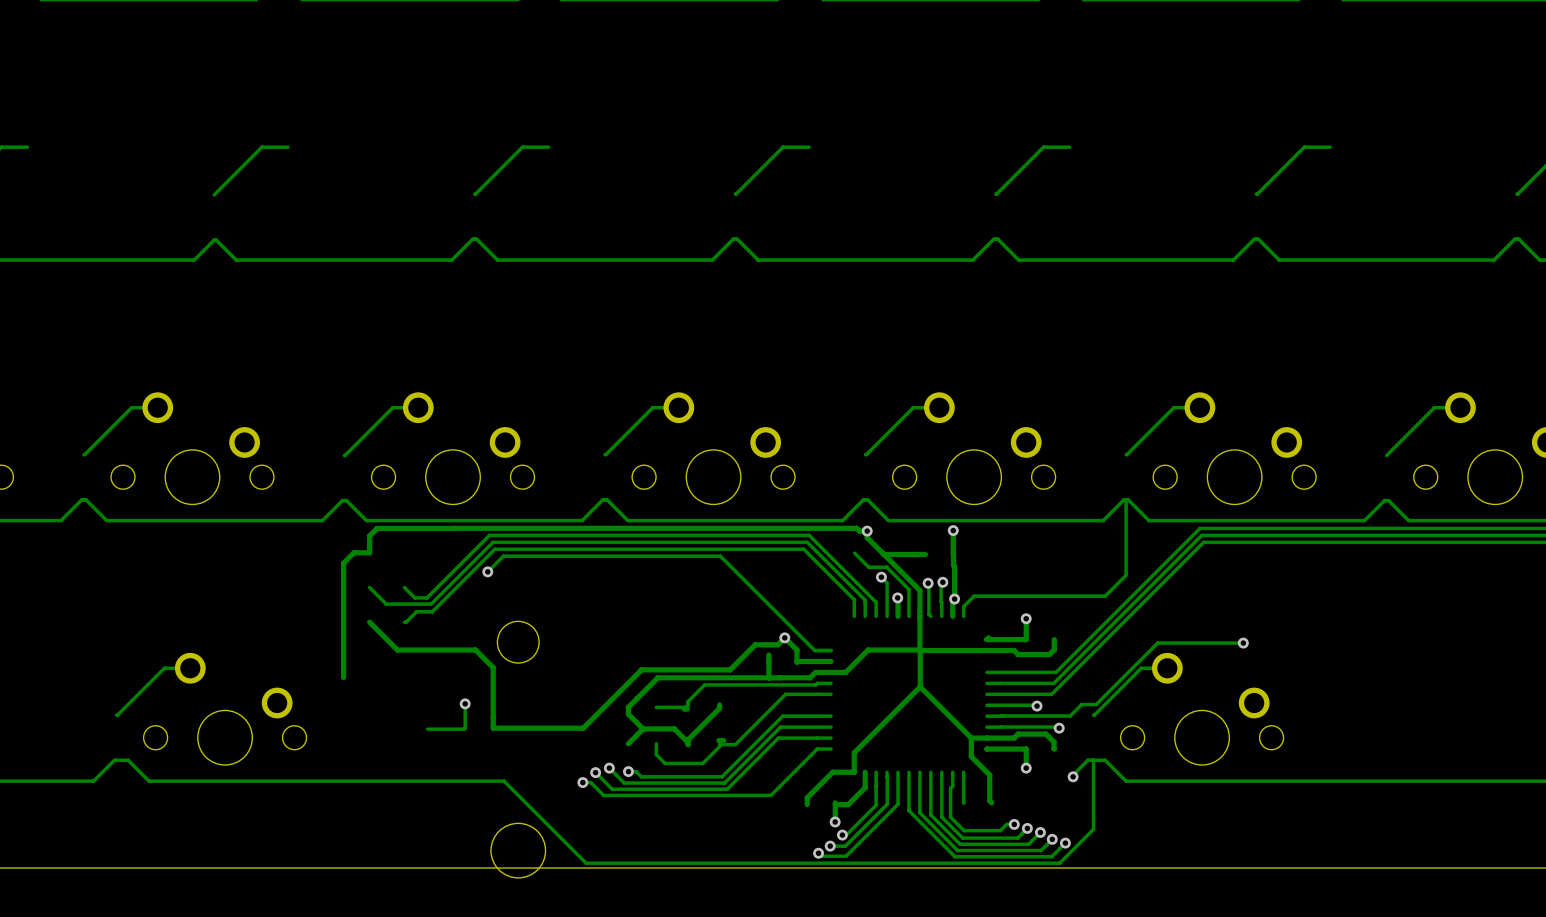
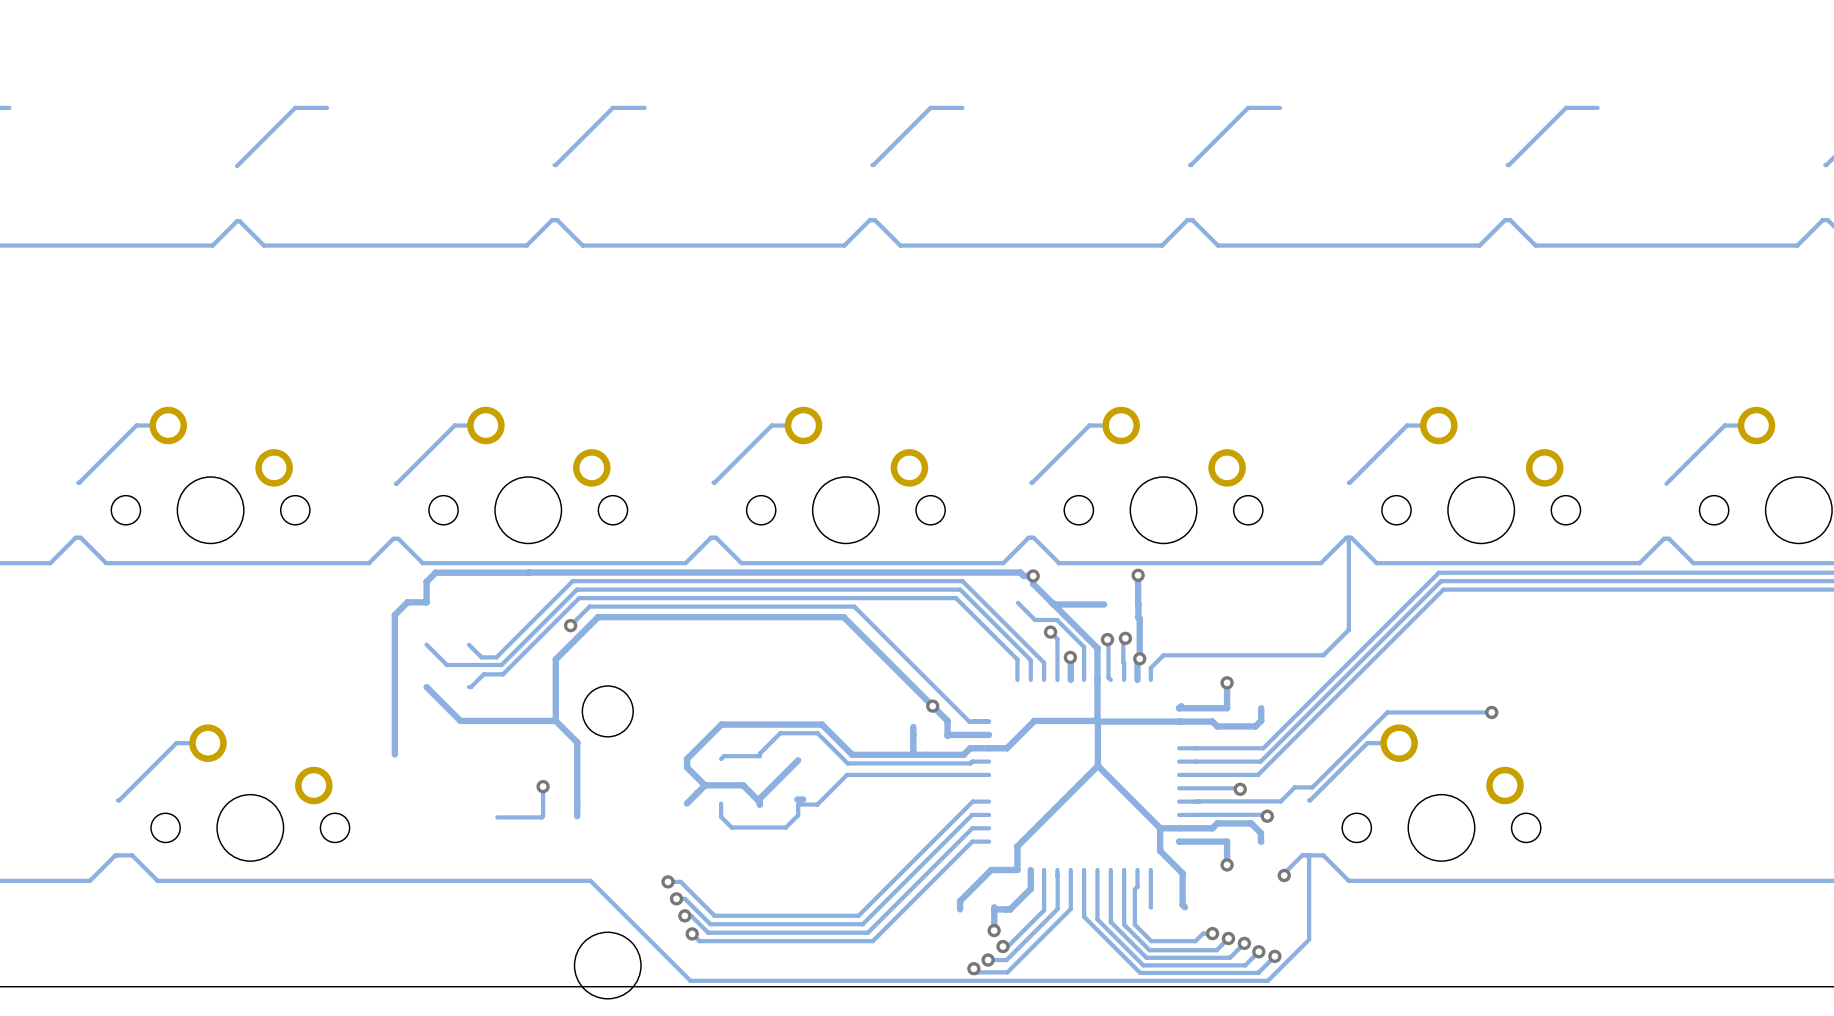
track: (784, 637) (777, 644) (755, 644) (730, 669) (641, 669) (583, 728) (493, 728) -> (932, 706) (843, 617) (598, 617) (555, 659) (555, 720)
track: (718, 677) (657, 677) (628, 707) -> (852, 754) (822, 724) (721, 724) (686, 759)
track: none -> (798, 760) (759, 798) (759, 804)
track: (715, 684) (704, 684) (688, 701) (685, 707) (656, 707) -> (847, 763) (817, 733) (780, 733) (759, 753) (759, 756) (723, 756) (721, 759)
track: (785, 694) (735, 744) (719, 744) (702, 763) (665, 763) (656, 754) (656, 743) -> (933, 774) (847, 774) (817, 804) (798, 804) (798, 815) (785, 827) (731, 827) (721, 816) (721, 803)
track: (719, 704) (719, 708) (688, 739) (688, 744) -> none
track: (628, 707) (628, 714) (643, 728) (674, 728) (688, 742) -> (687, 759) (687, 767) (704, 785) (743, 785) (759, 802)
track: (687, 709) (684, 709) -> none
track: (817, 716) (782, 716) (722, 776) (641, 776) (636, 771) (628, 771) -> (972, 801) (858, 915) (714, 915) (680, 881) (668, 881)
track: (817, 727) (780, 727) (724, 783) (624, 783) (609, 768) -> (972, 814) (862, 924) (710, 924) (684, 898) (676, 898)
track: (643, 728) (628, 743) -> (705, 785) (686, 803)
track: (817, 738) (778, 738) (727, 789) (612, 789) (595, 772) -> (972, 828) (867, 932) (708, 932) (691, 915) (684, 915)
track: (723, 740) (718, 740) -> (803, 799) (797, 799)
via: (609, 768) -> none
via: (628, 771) -> none
via: (595, 772) -> none
via: none -> (668, 881)
track: (582, 782) (590, 782) (603, 795) (770, 795) -> (692, 933) (699, 941) (872, 941) (915, 898)
via: (582, 782) -> none
via: none -> (676, 898)
via: none -> (684, 915)
via: none -> (692, 933)

